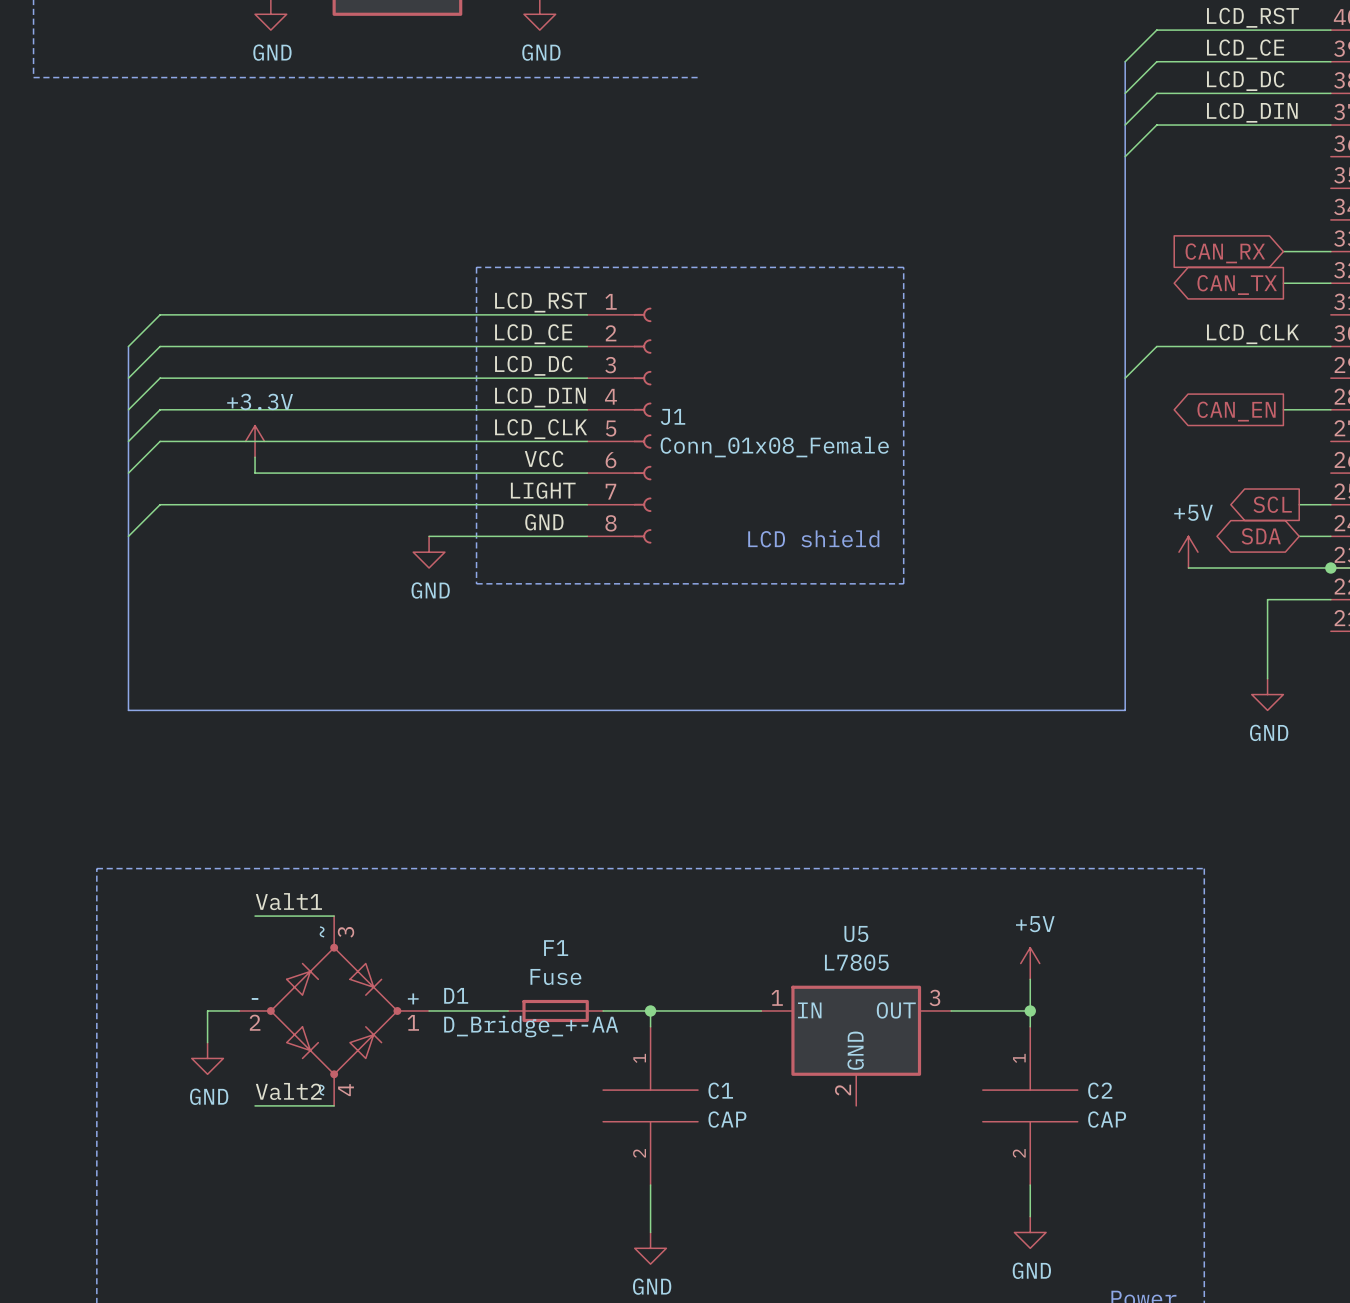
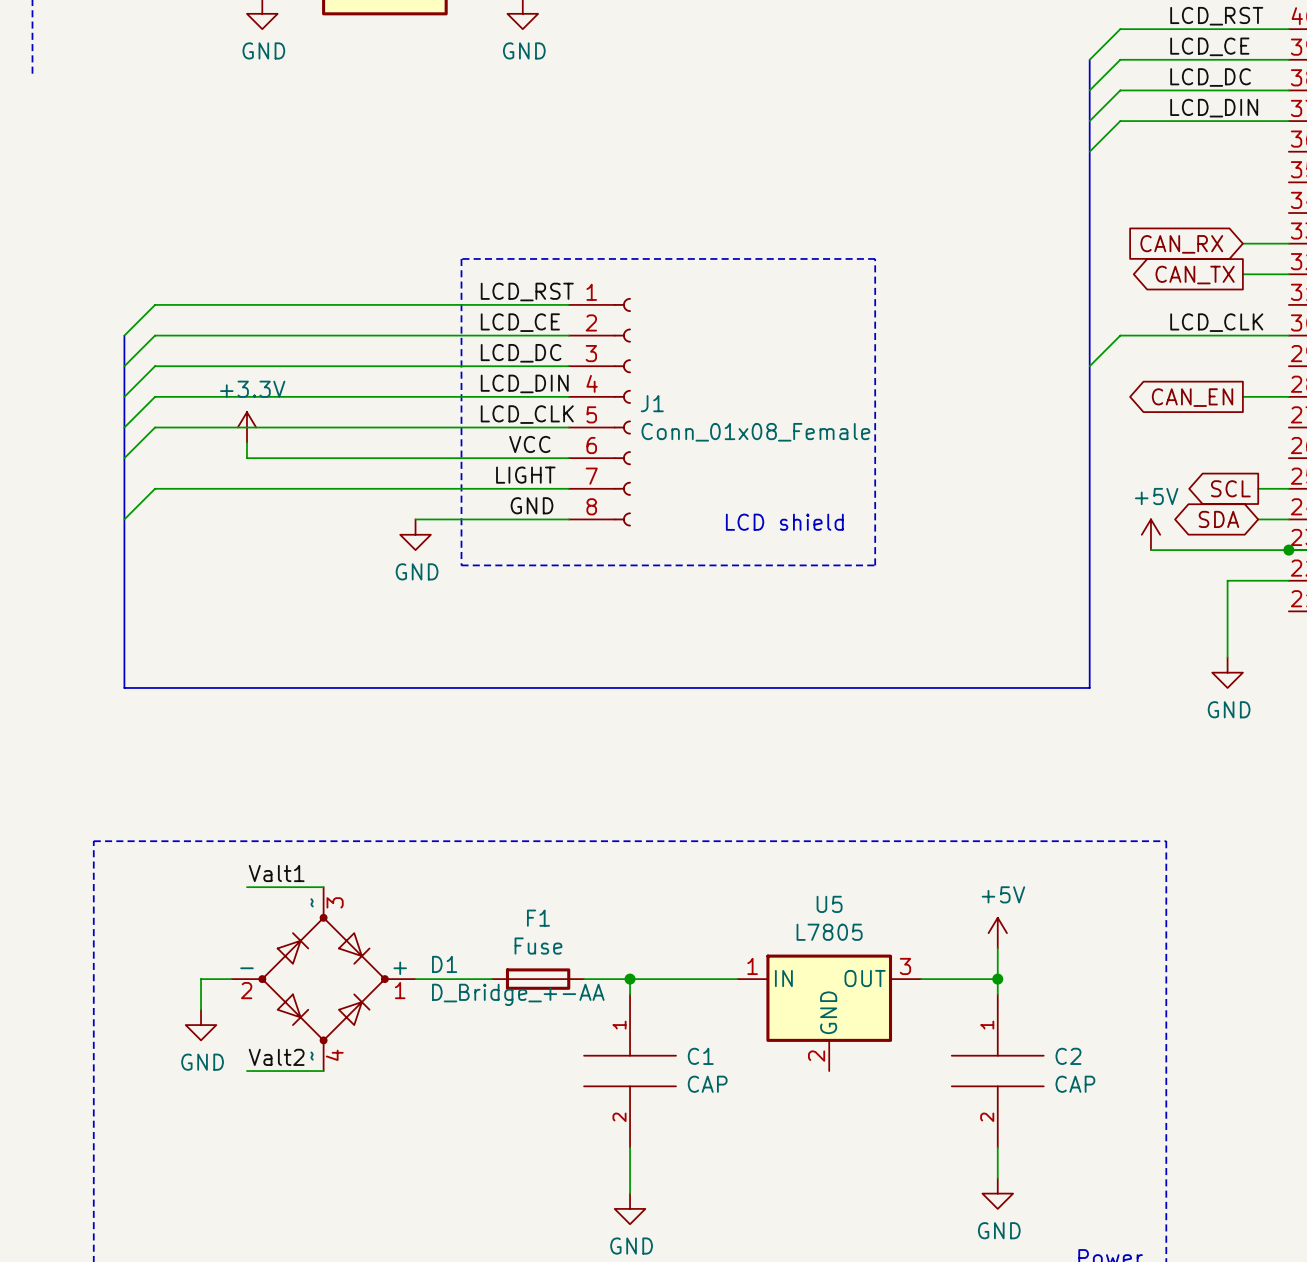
line: (33, 77) (698, 77) -> none

